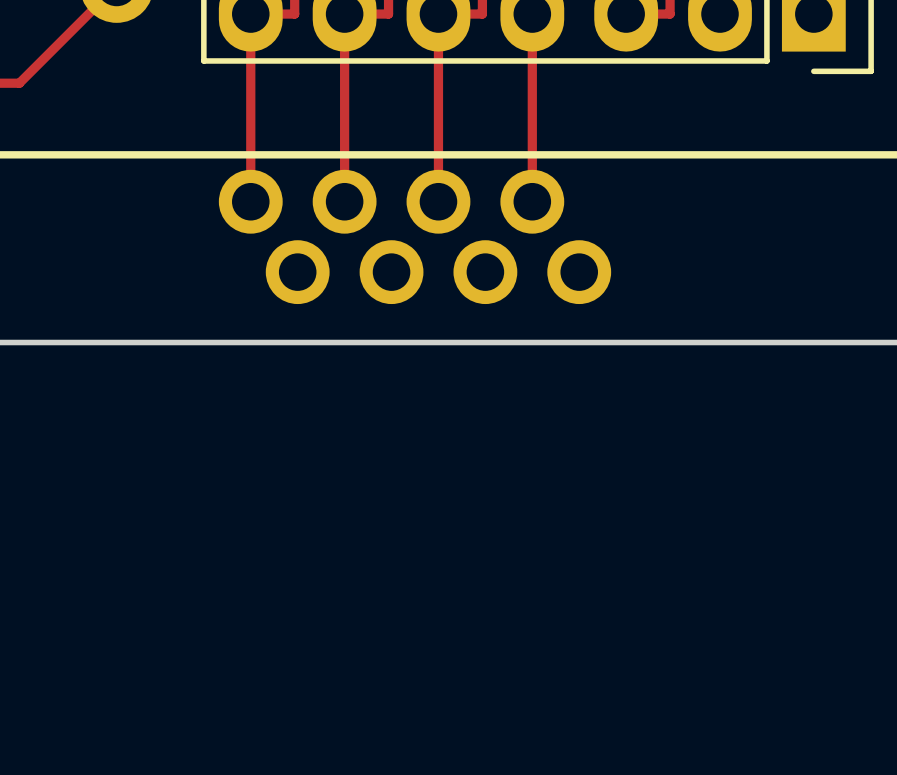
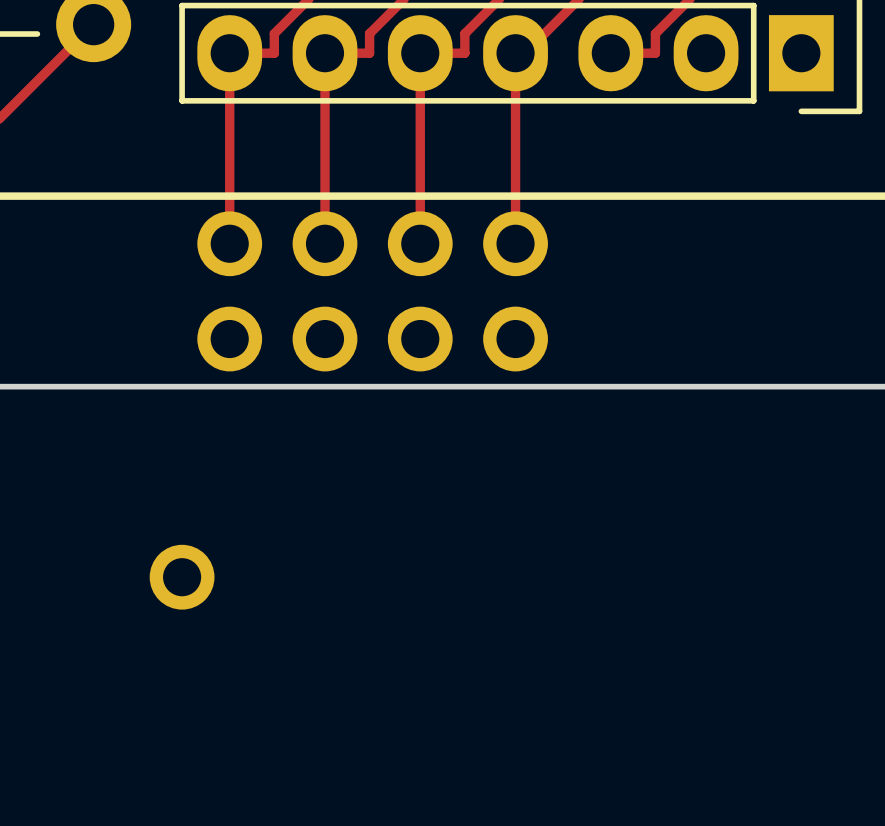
part: (297, 272) -> none
part: (391, 272) -> none
part: (485, 272) -> none
part: (579, 272) -> none
part: none -> (229, 339)
part: none -> (325, 339)
part: none -> (420, 339)
part: none -> (515, 339)
part: none -> (182, 577)

